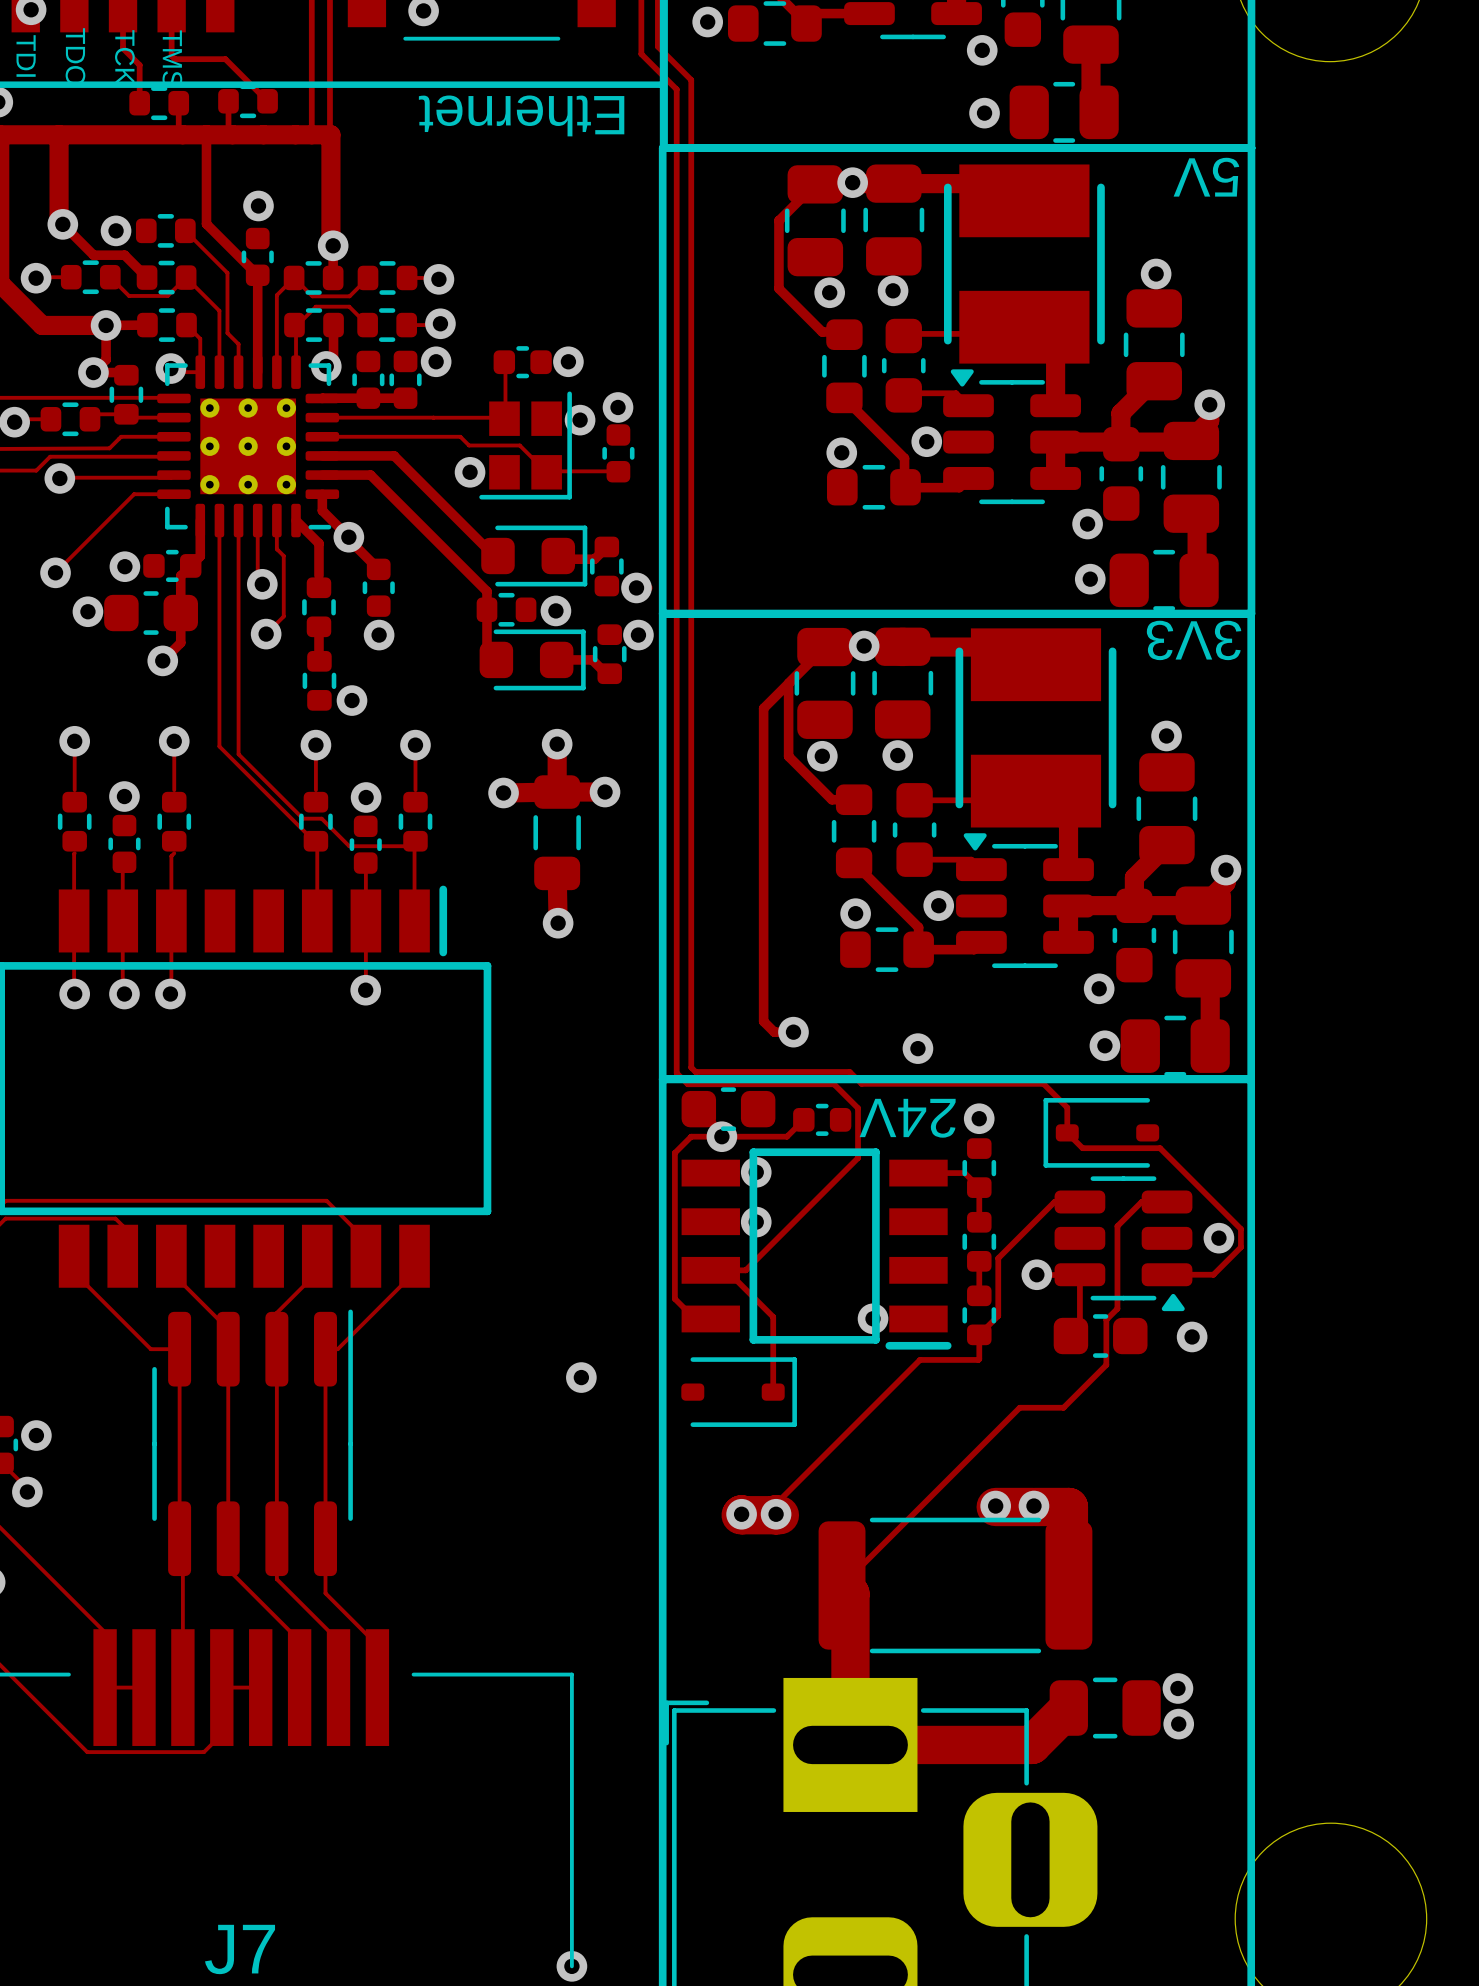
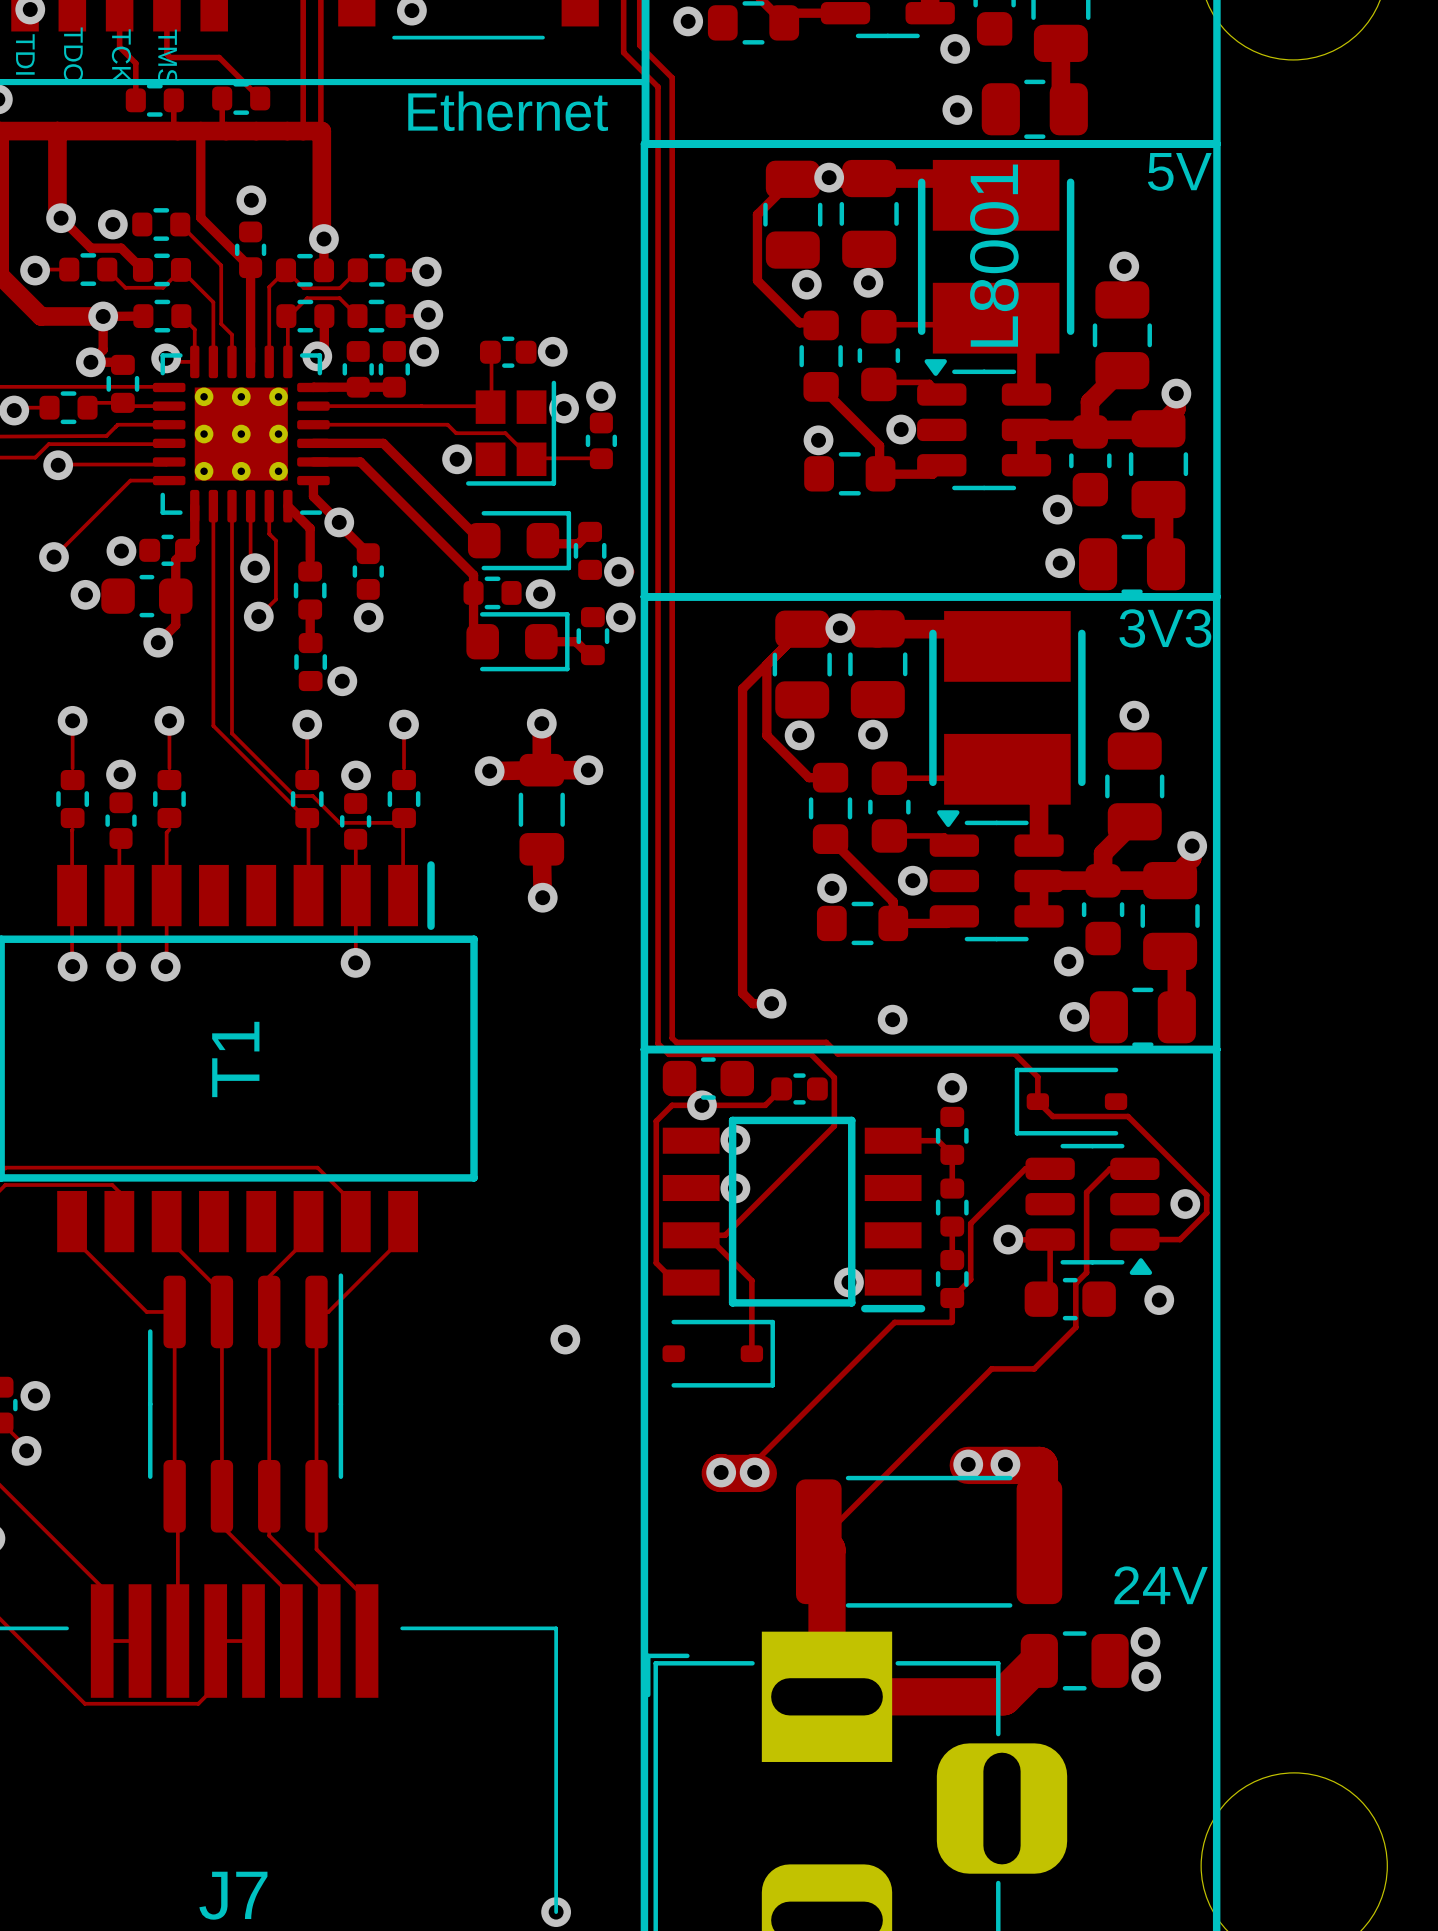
text rotation: 0° (521, 115) -> 180° (508, 111)
text rotation: 0° (1206, 177) -> 180° (1179, 171)
L8001 name: none -> L8001 (994, 255)
text rotation: 0° (1194, 640) -> 180° (1165, 628)
T1 name: none -> T1 (235, 1059)
text rotation: 0° (907, 1118) -> 180° (1161, 1585)
text position: 24V (907, 1118) -> 24V (1161, 1585)

